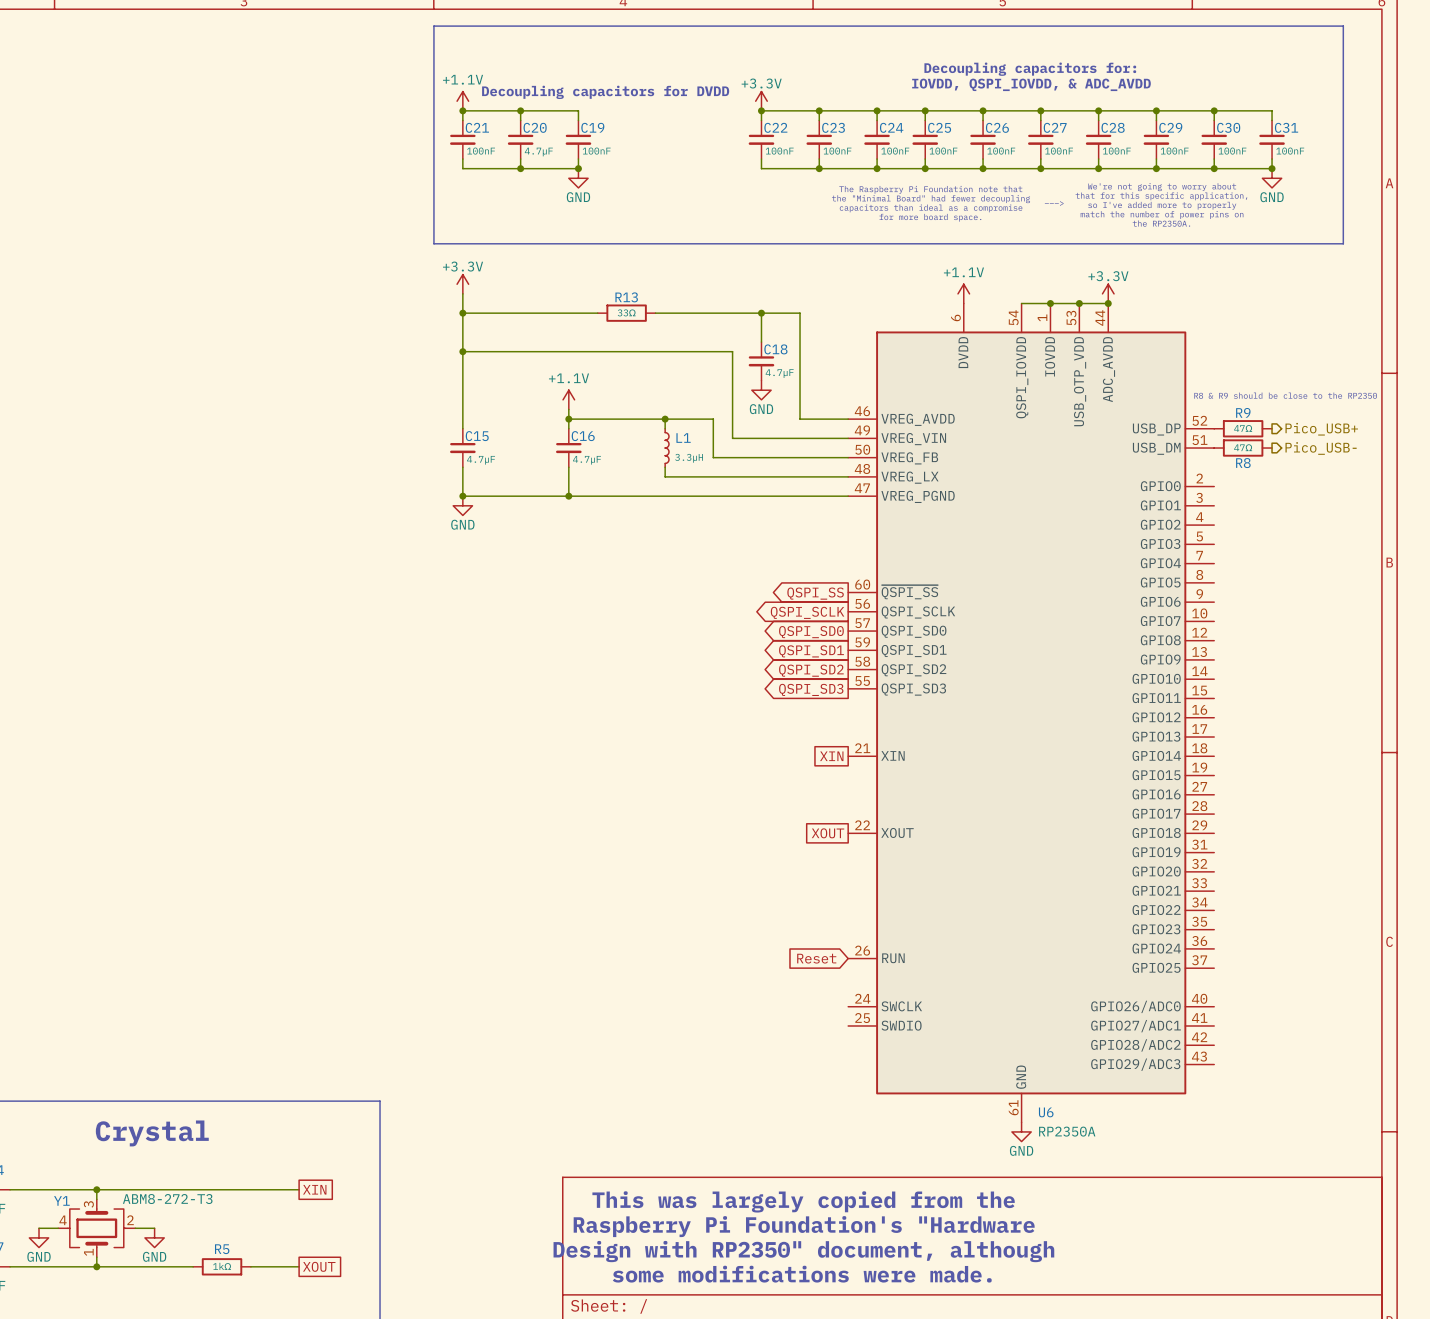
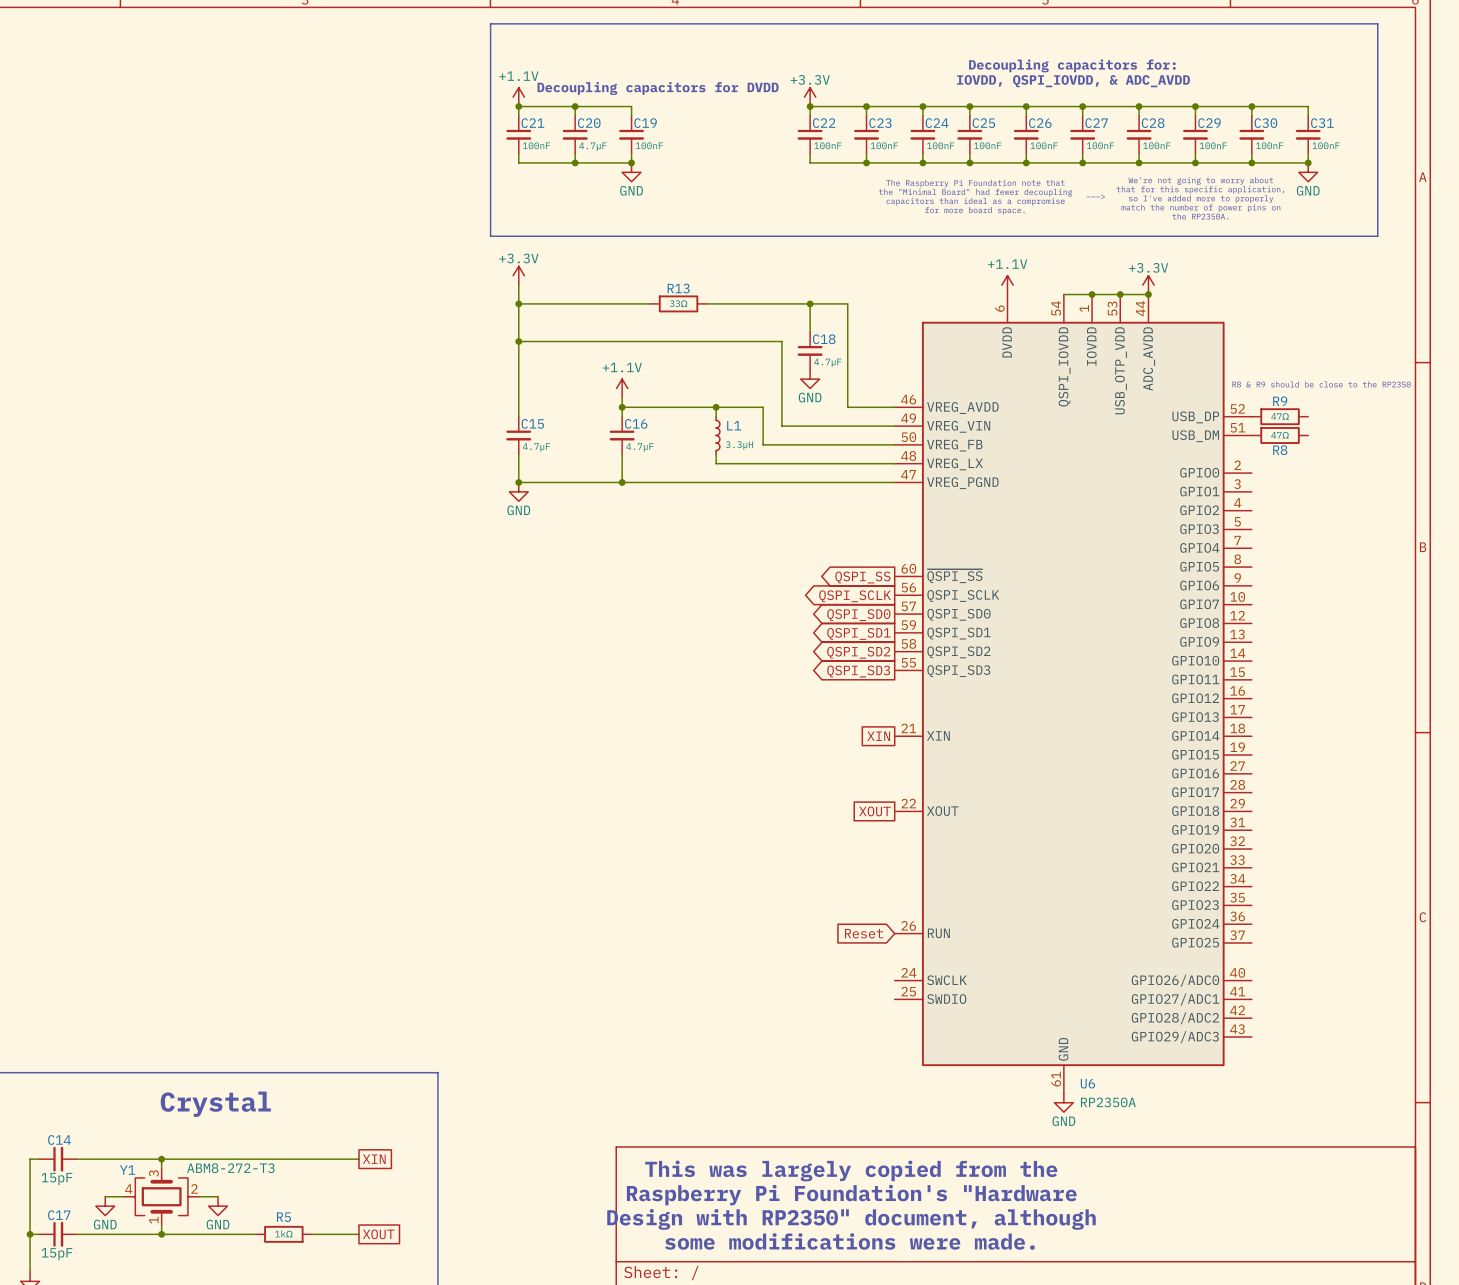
hierarchical label: Pico_USB+ (1321, 429) -> none
hierarchical label: Pico_USB- (1321, 448) -> none

